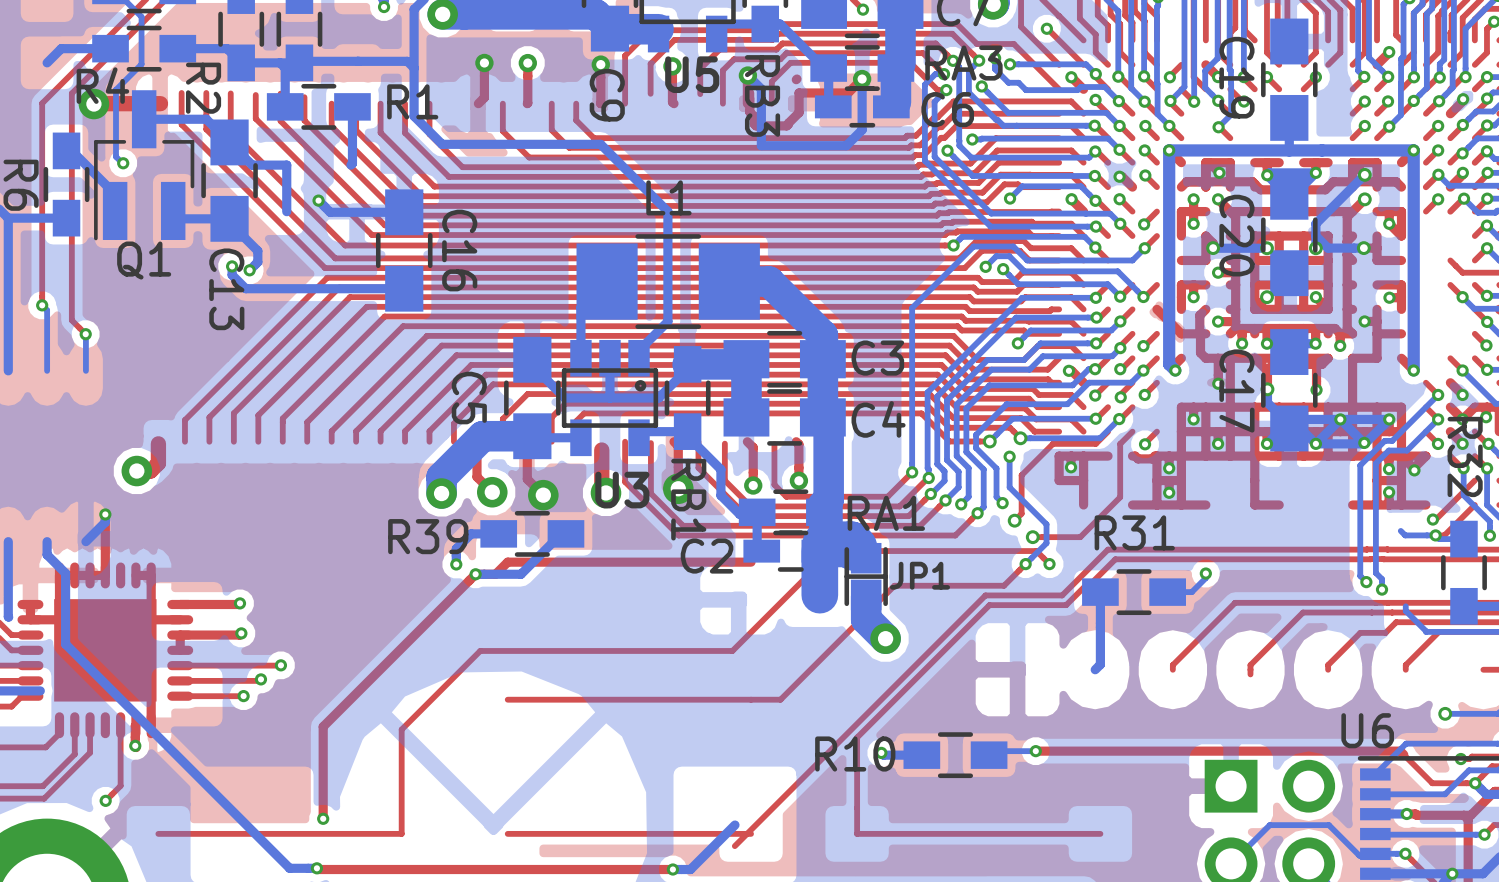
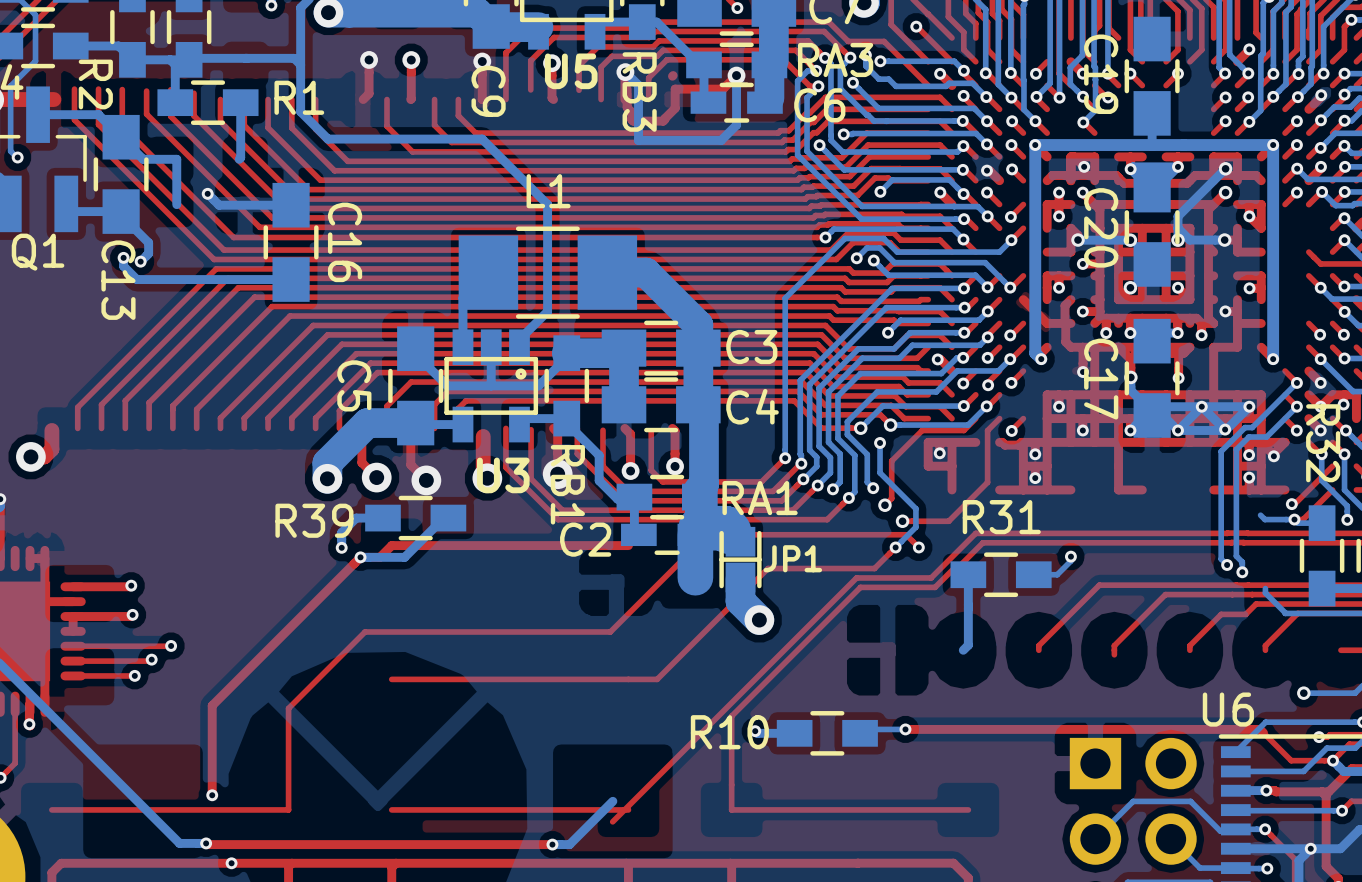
top track: none -> (1308, 323) (1320, 334)
via: none -> (1320, 334)

